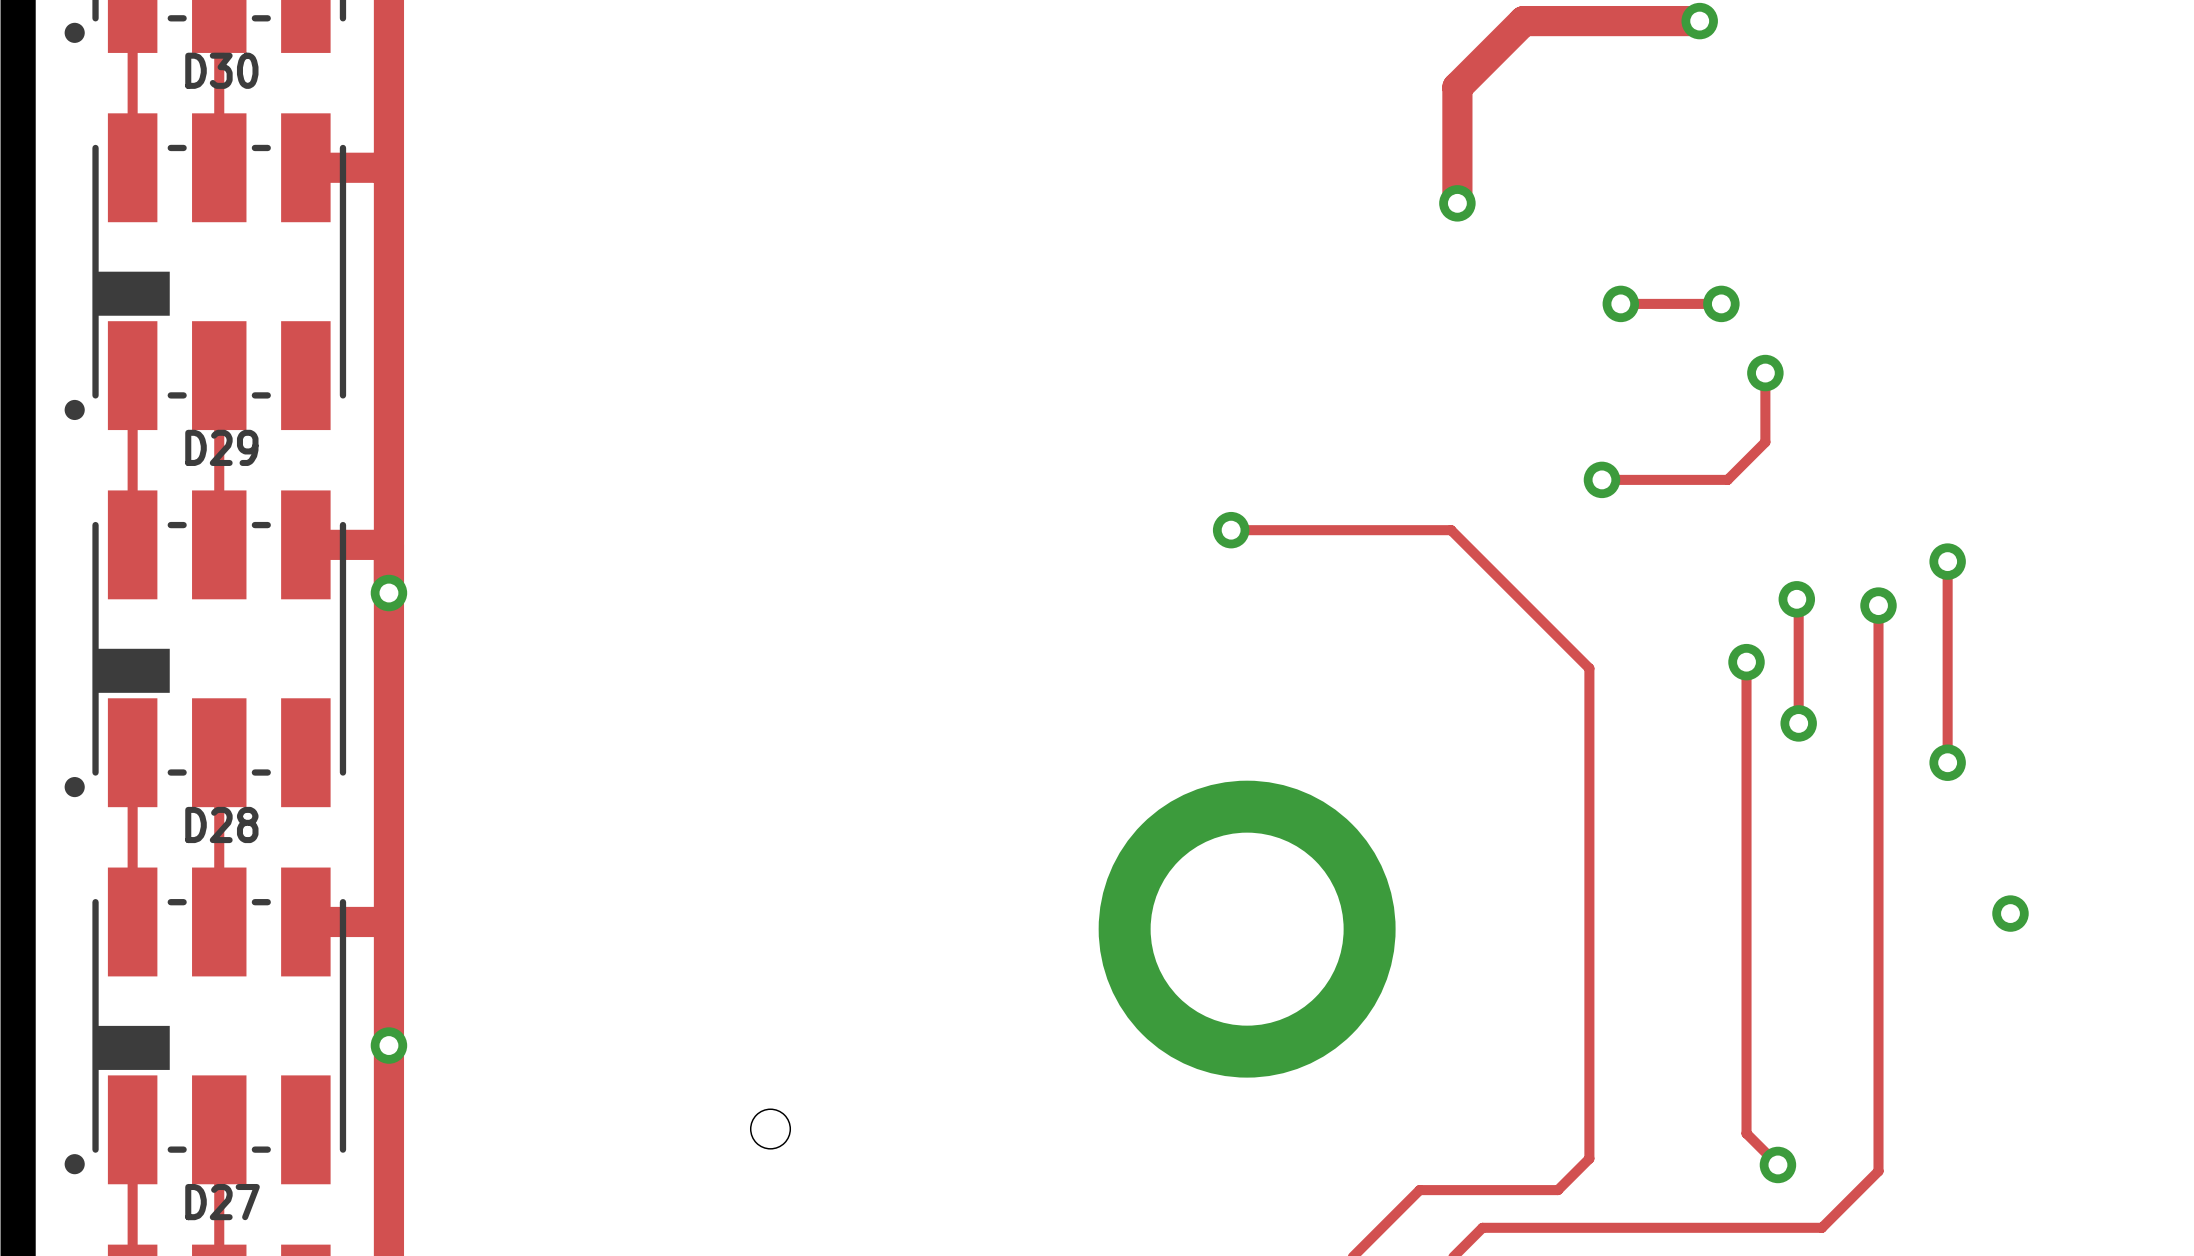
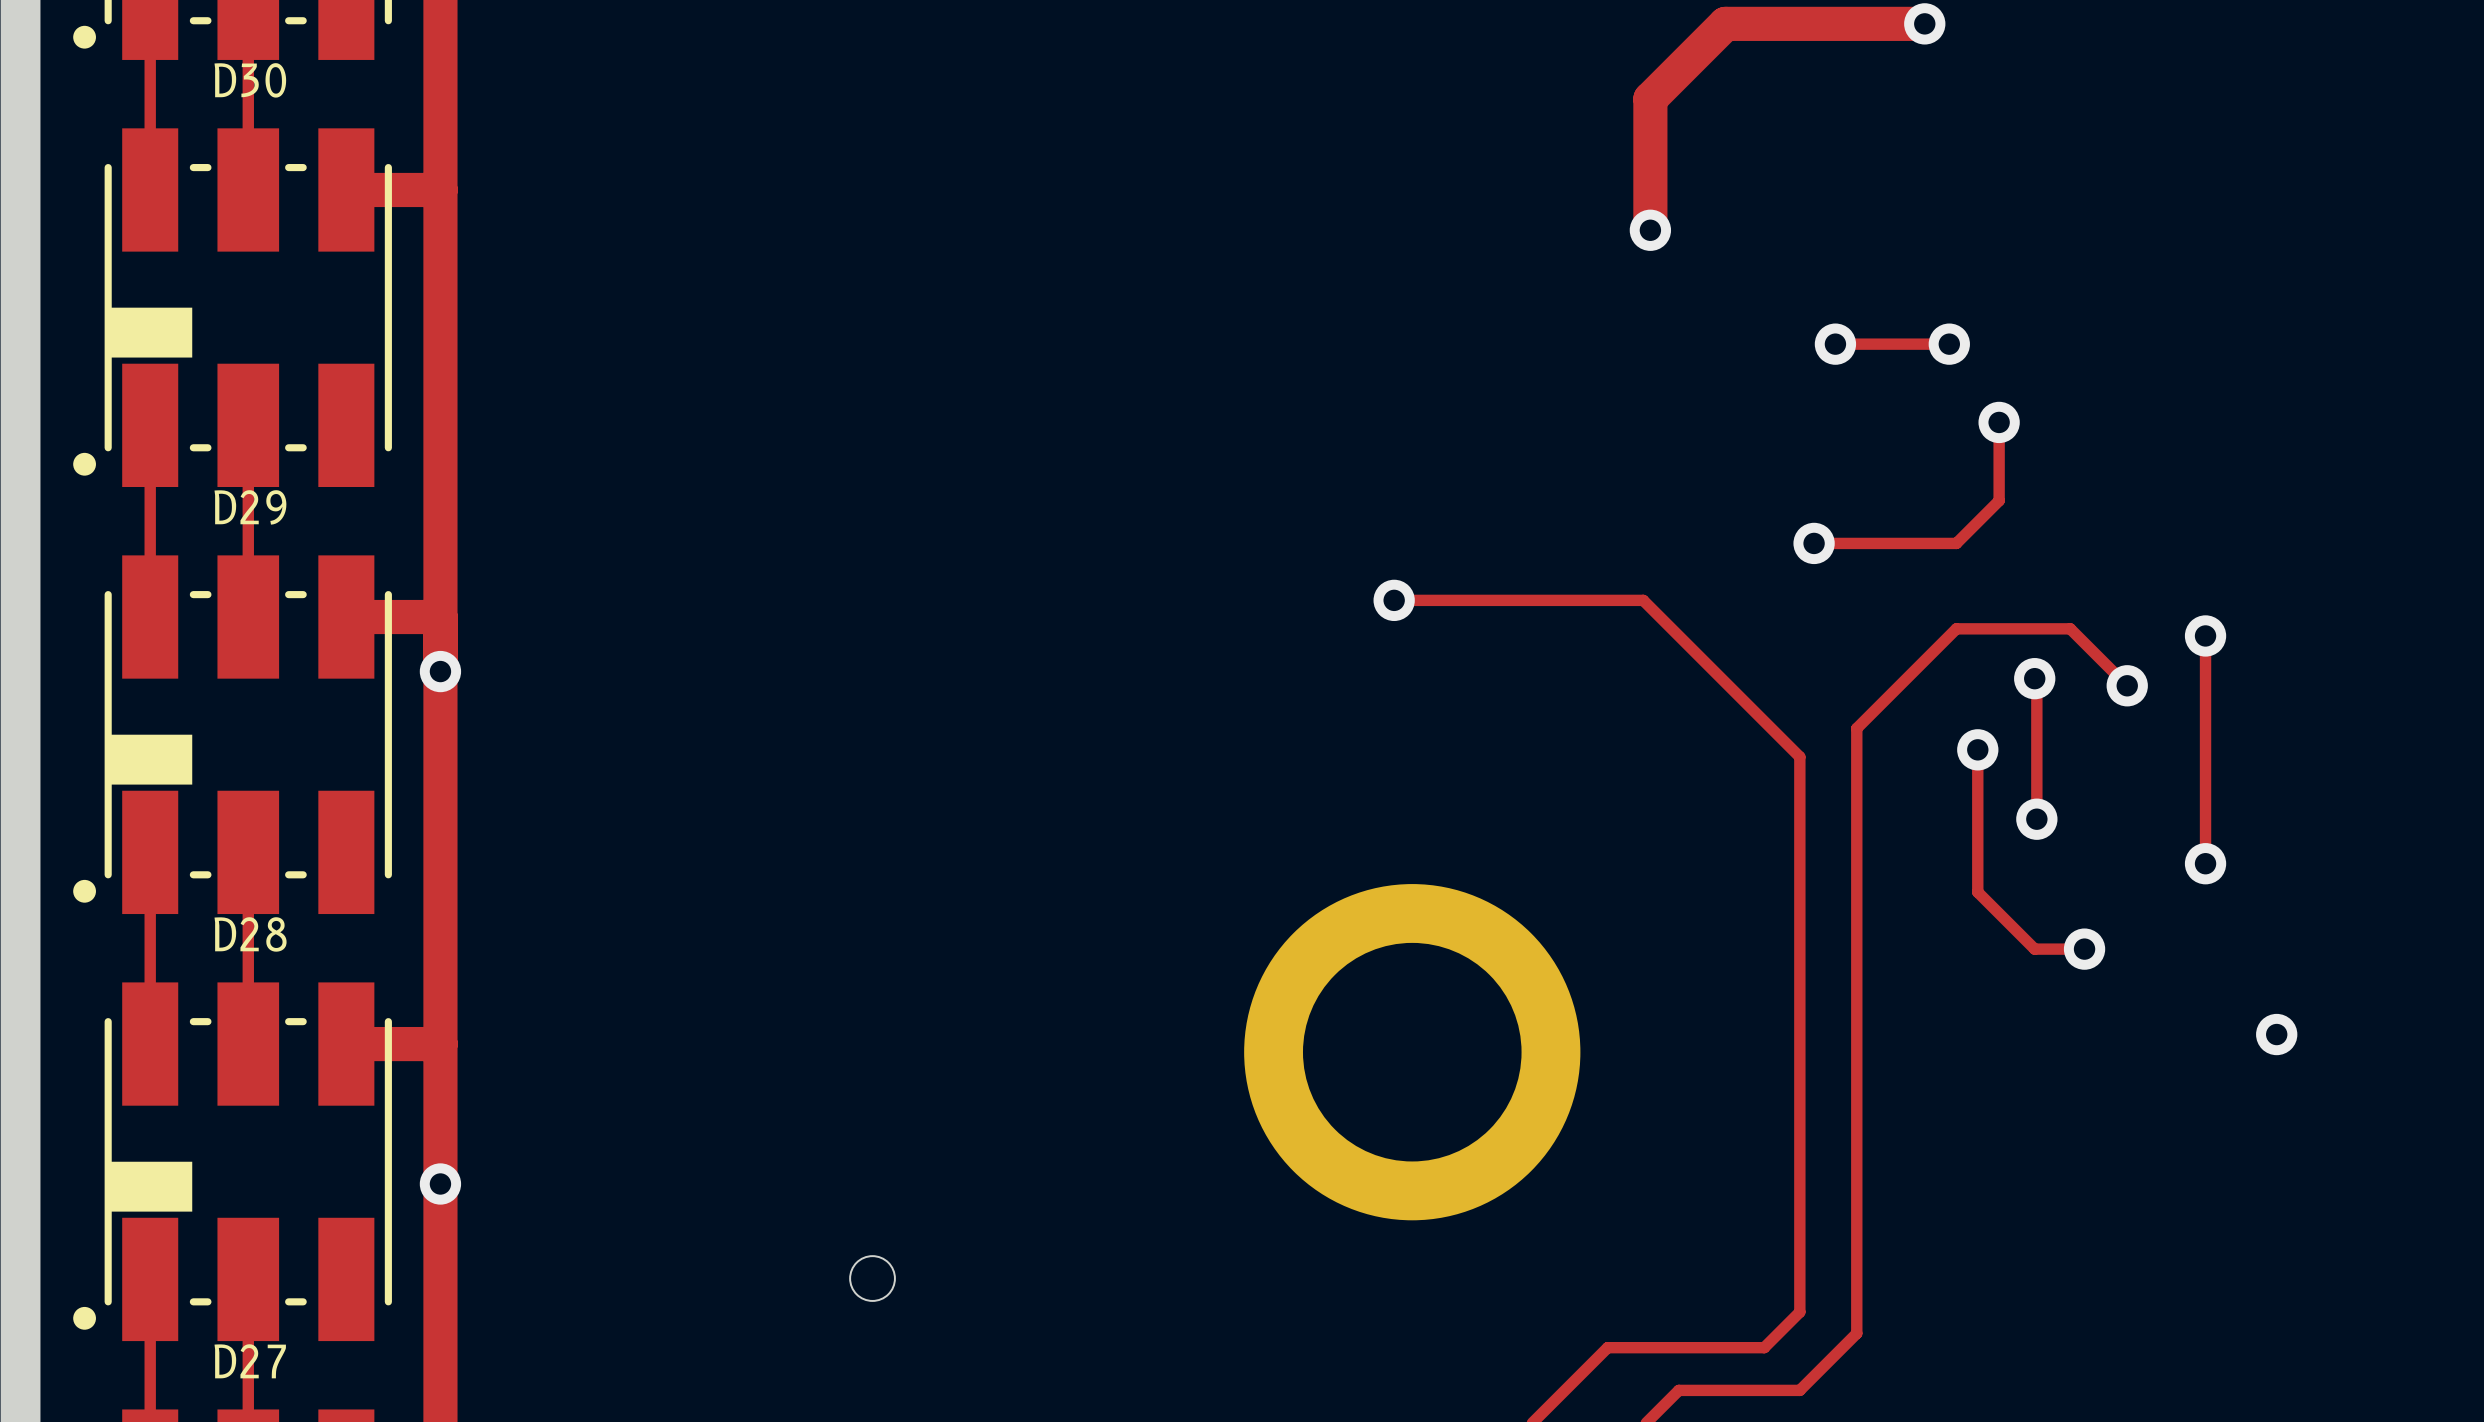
track: (1878, 605) (1878, 1171) (1821, 1227) (1589, 1227) -> (2127, 685) (2070, 628) (1956, 628) (1856, 728) (1856, 1333) (1799, 1390)
track: (1746, 787) (1746, 1133) (1777, 1164) -> (1977, 892) (2034, 949) (2084, 949)
via: none -> (2084, 949)
via: (1777, 1164) -> none

